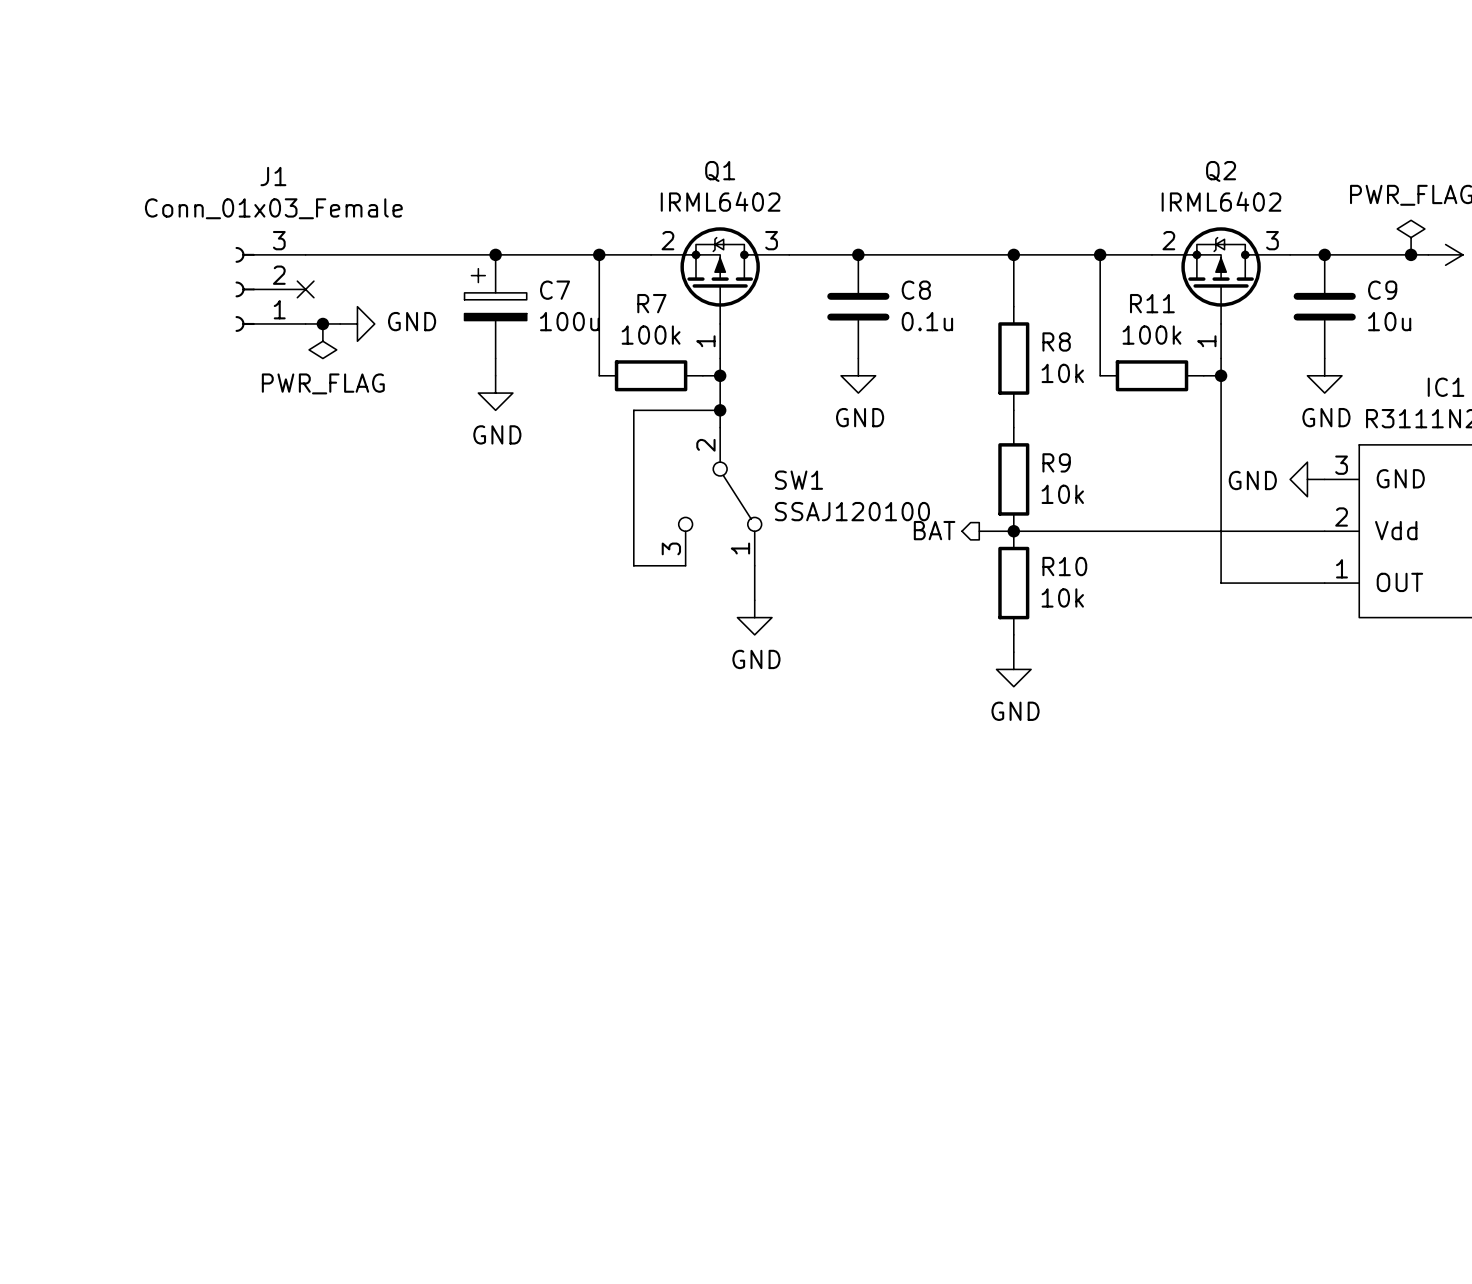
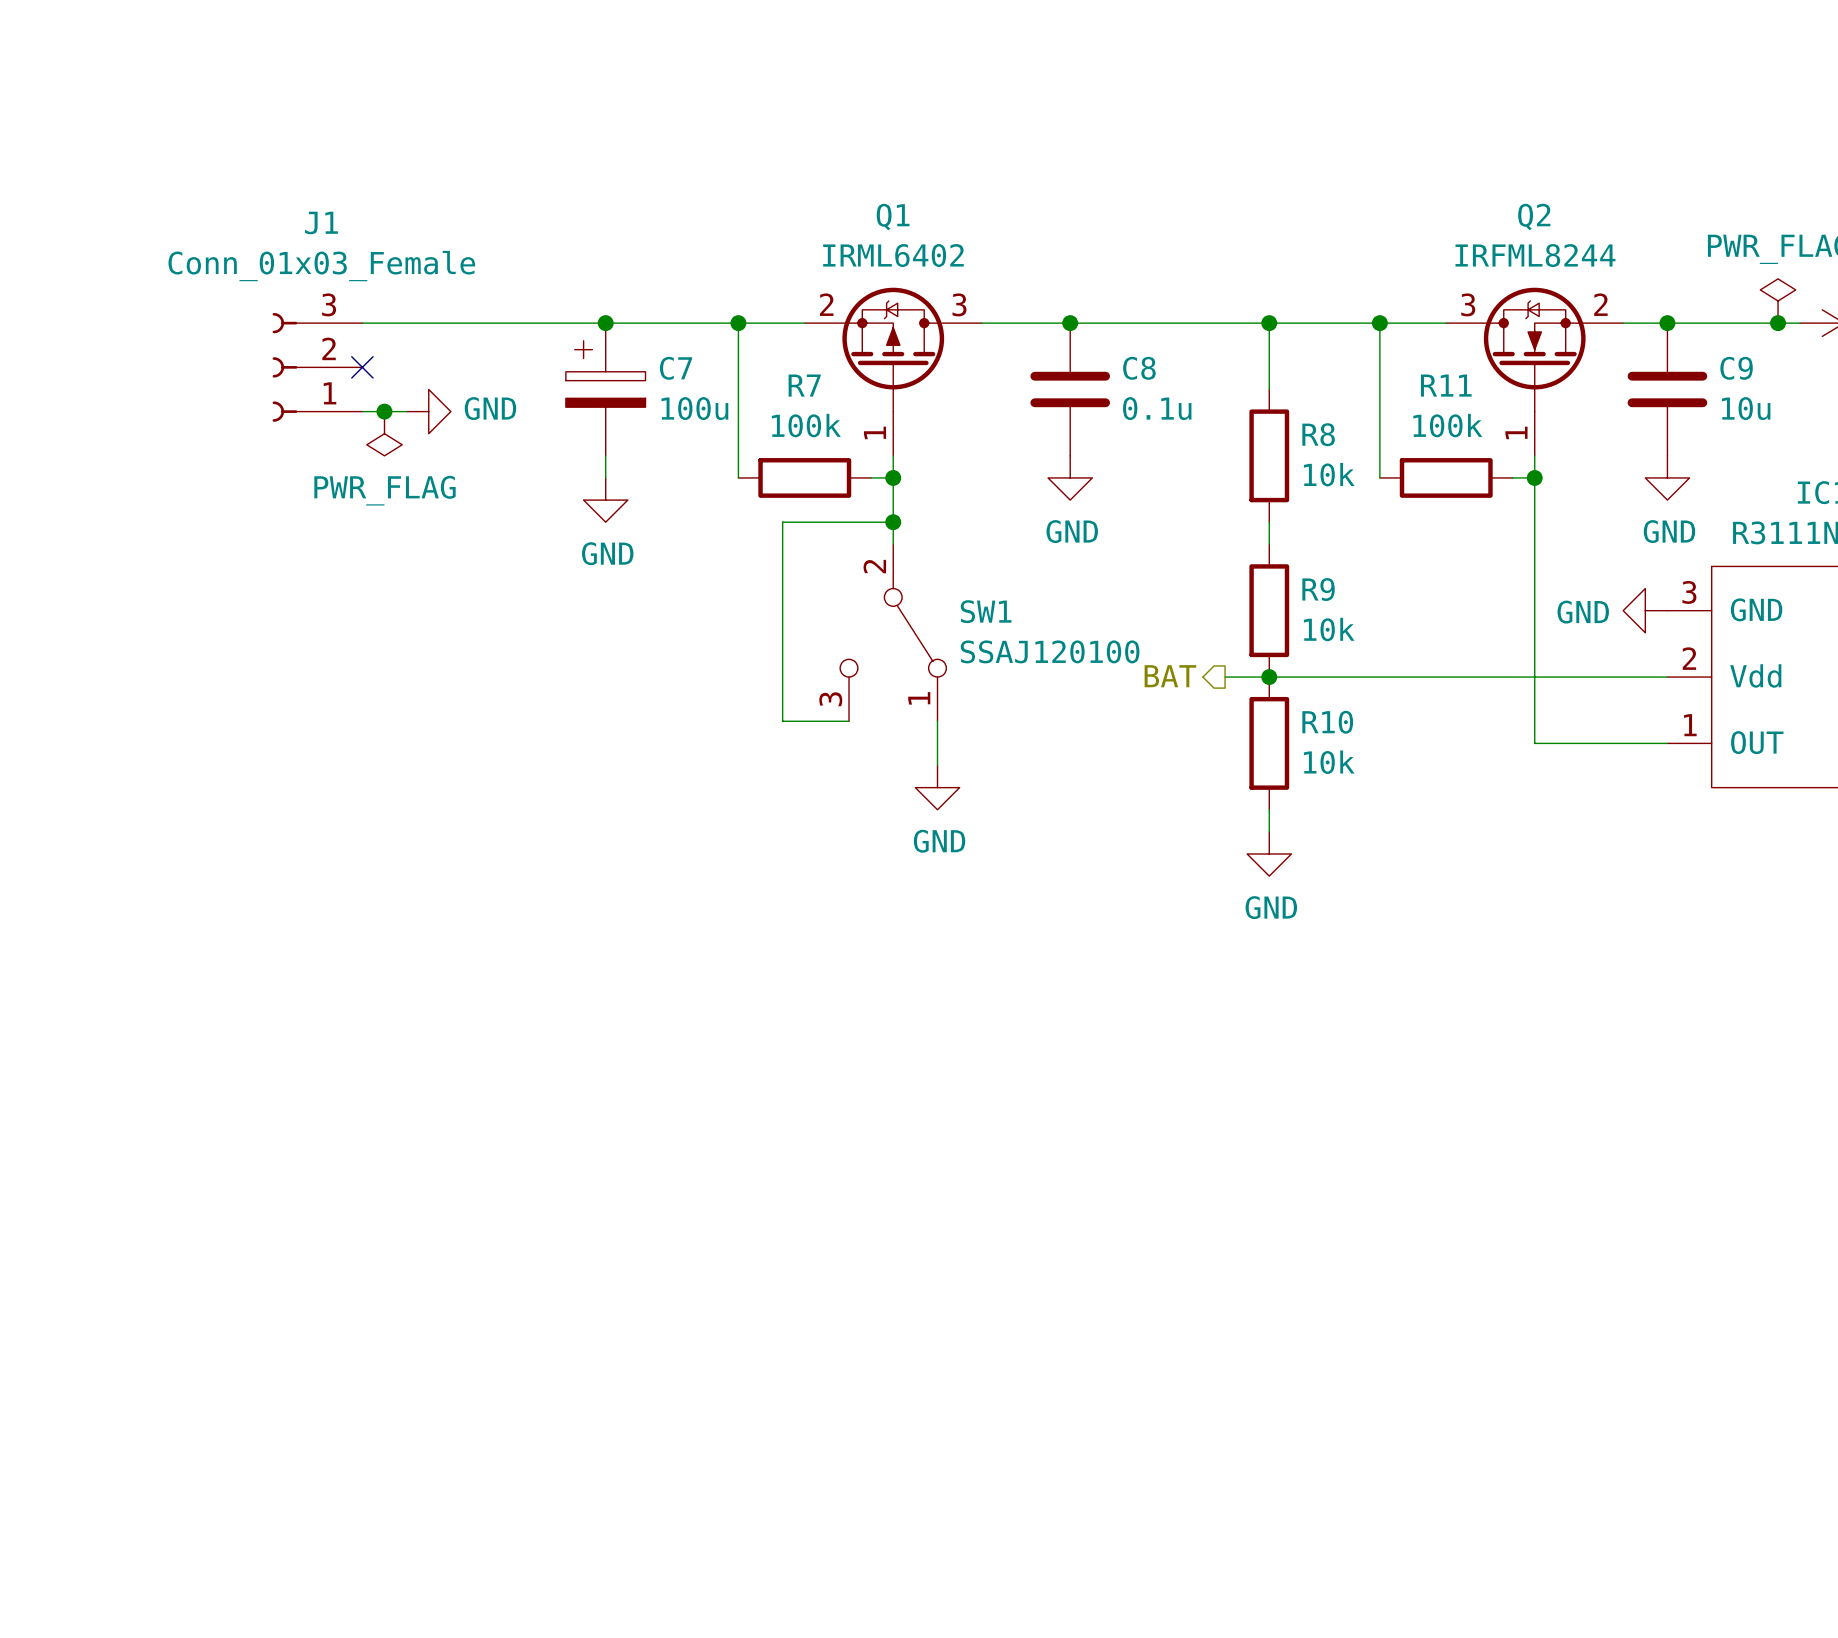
Q2 value: IRML6402 (1221, 201) -> IRFML8244 (1535, 255)
Q2 symbol: [1151, 227, 1291, 359] -> [1446, 287, 1624, 456]

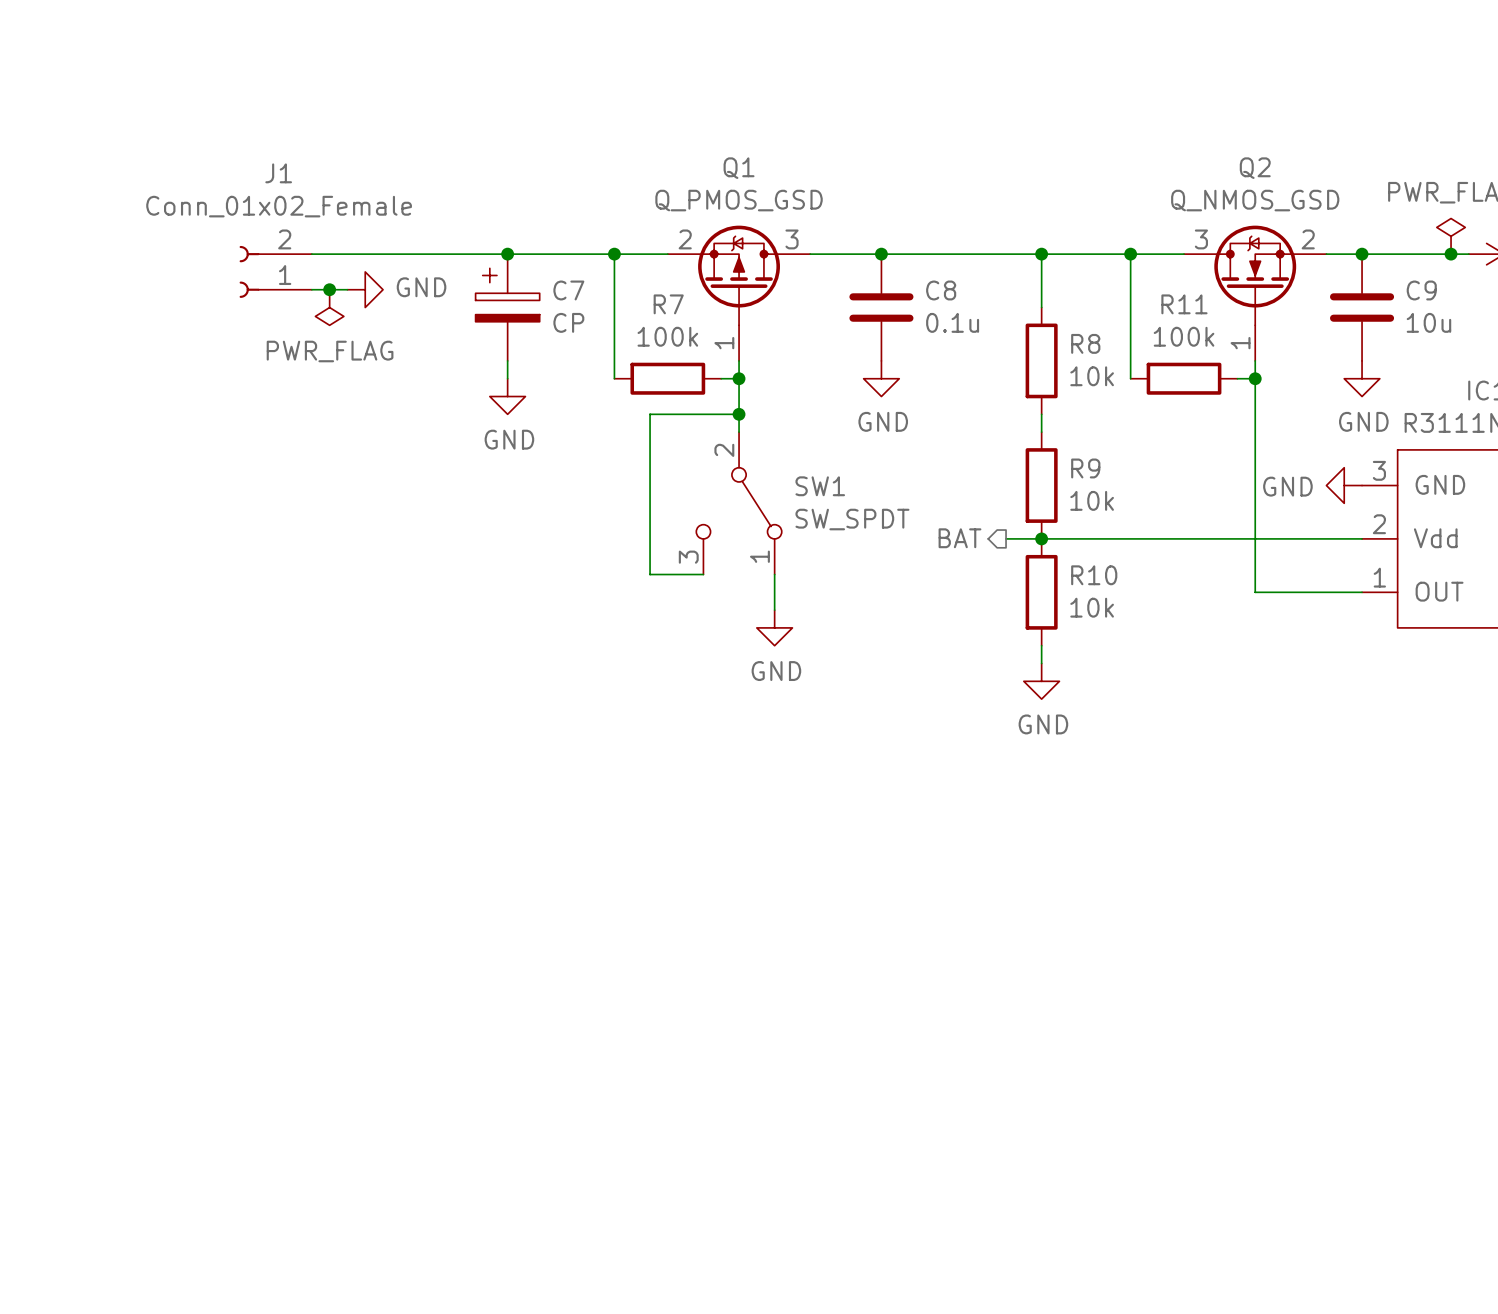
Q1 value: IRML6402 (893, 255) -> Q_PMOS_GSD (739, 200)
Q2 value: IRFML8244 (1535, 255) -> Q_NMOS_GSD (1255, 200)
J1 value: Conn_01x03_Female (321, 266) -> Conn_01x02_Female (279, 206)
J1 symbol: [272, 312, 363, 422] -> [239, 245, 312, 298]
no-connect mark: (362, 367) -> none
C7 value: 100u (694, 408) -> CP (568, 322)
wire: (362, 411) (406, 411) -> (311, 289) (347, 289)
junction position: (384, 411) -> (329, 289)
power symbol position: GND (428, 411) -> GND (365, 289)
power symbol position: PWR_FLAG (384, 433) -> PWR_FLAG (329, 307)
SW1 value: SSAJ120100 (1050, 651) -> SW_SPDT (852, 519)

